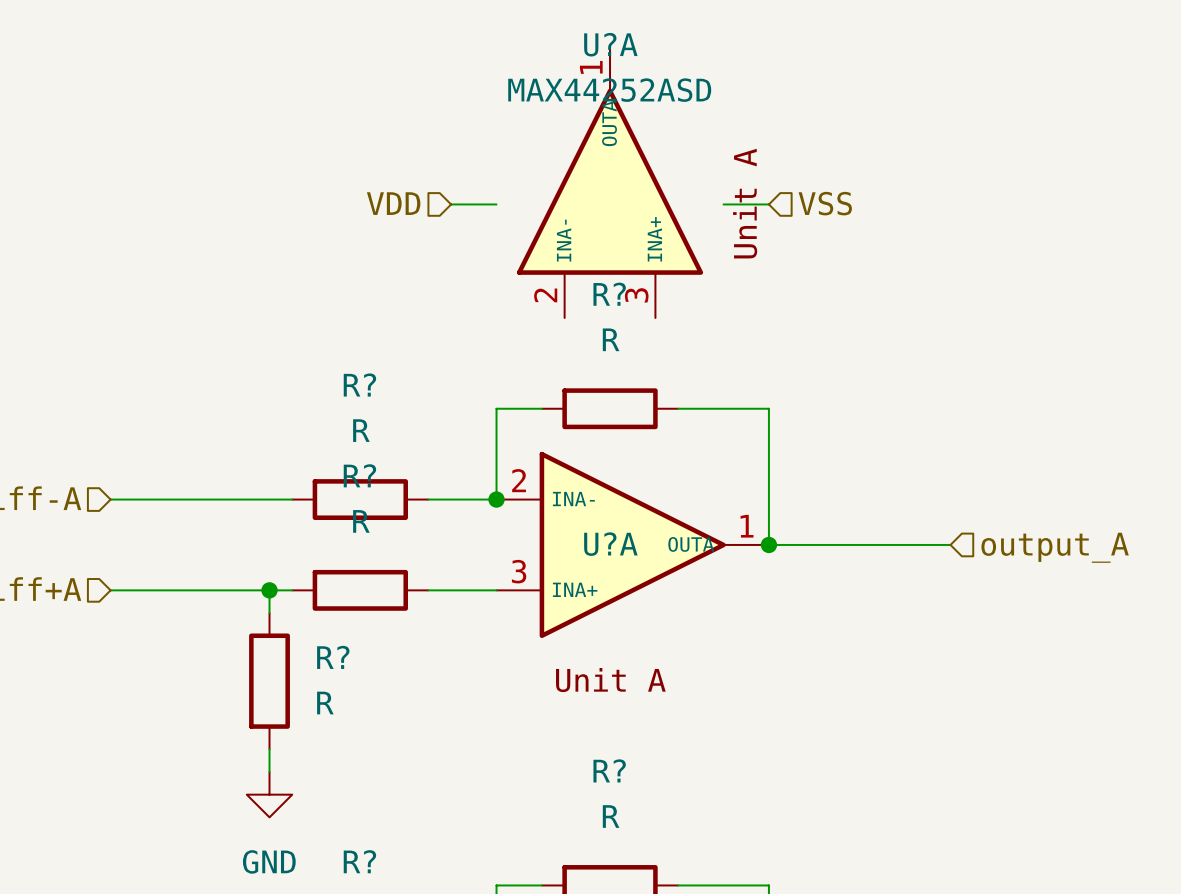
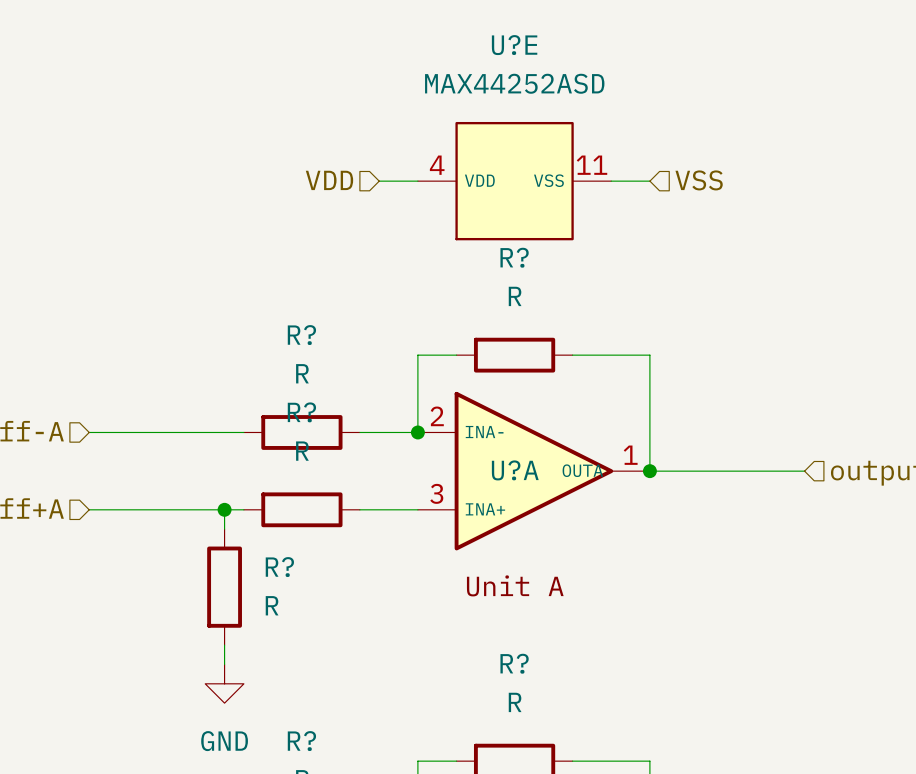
U?A: MAX44252ASD (610, 181) -> none
U?E: none -> MAX44252ASD (514, 181)

